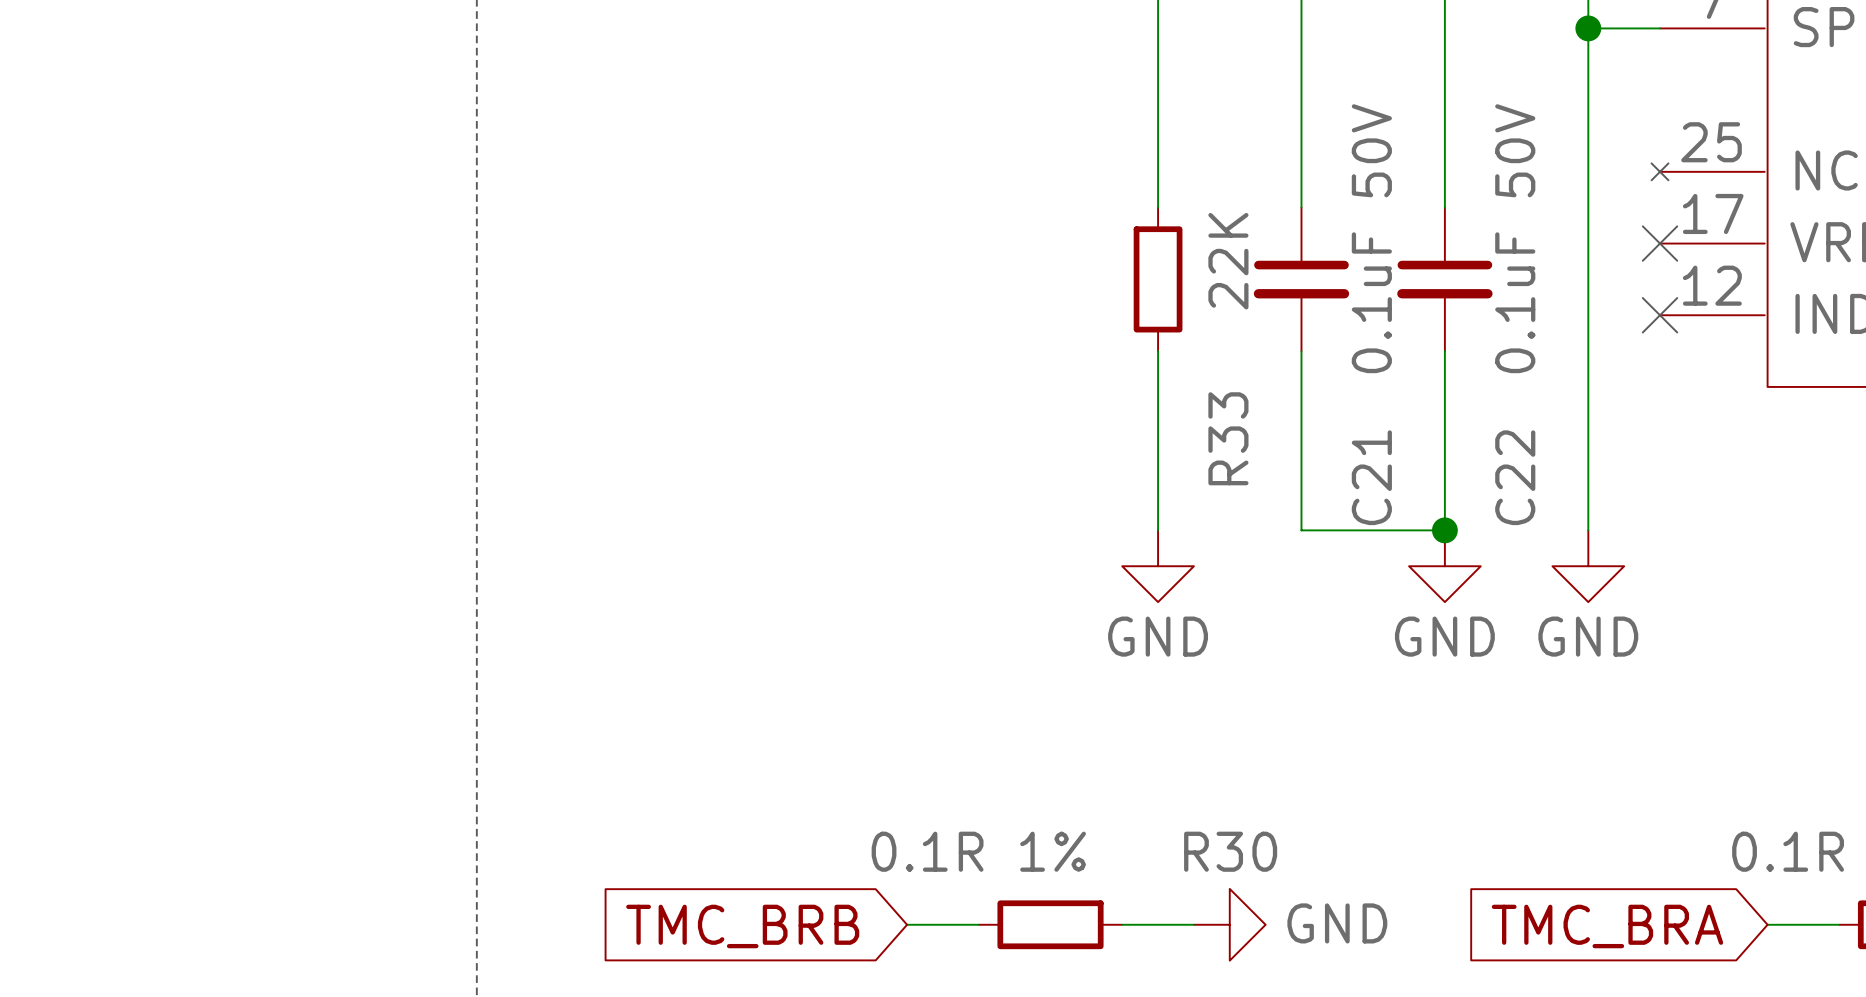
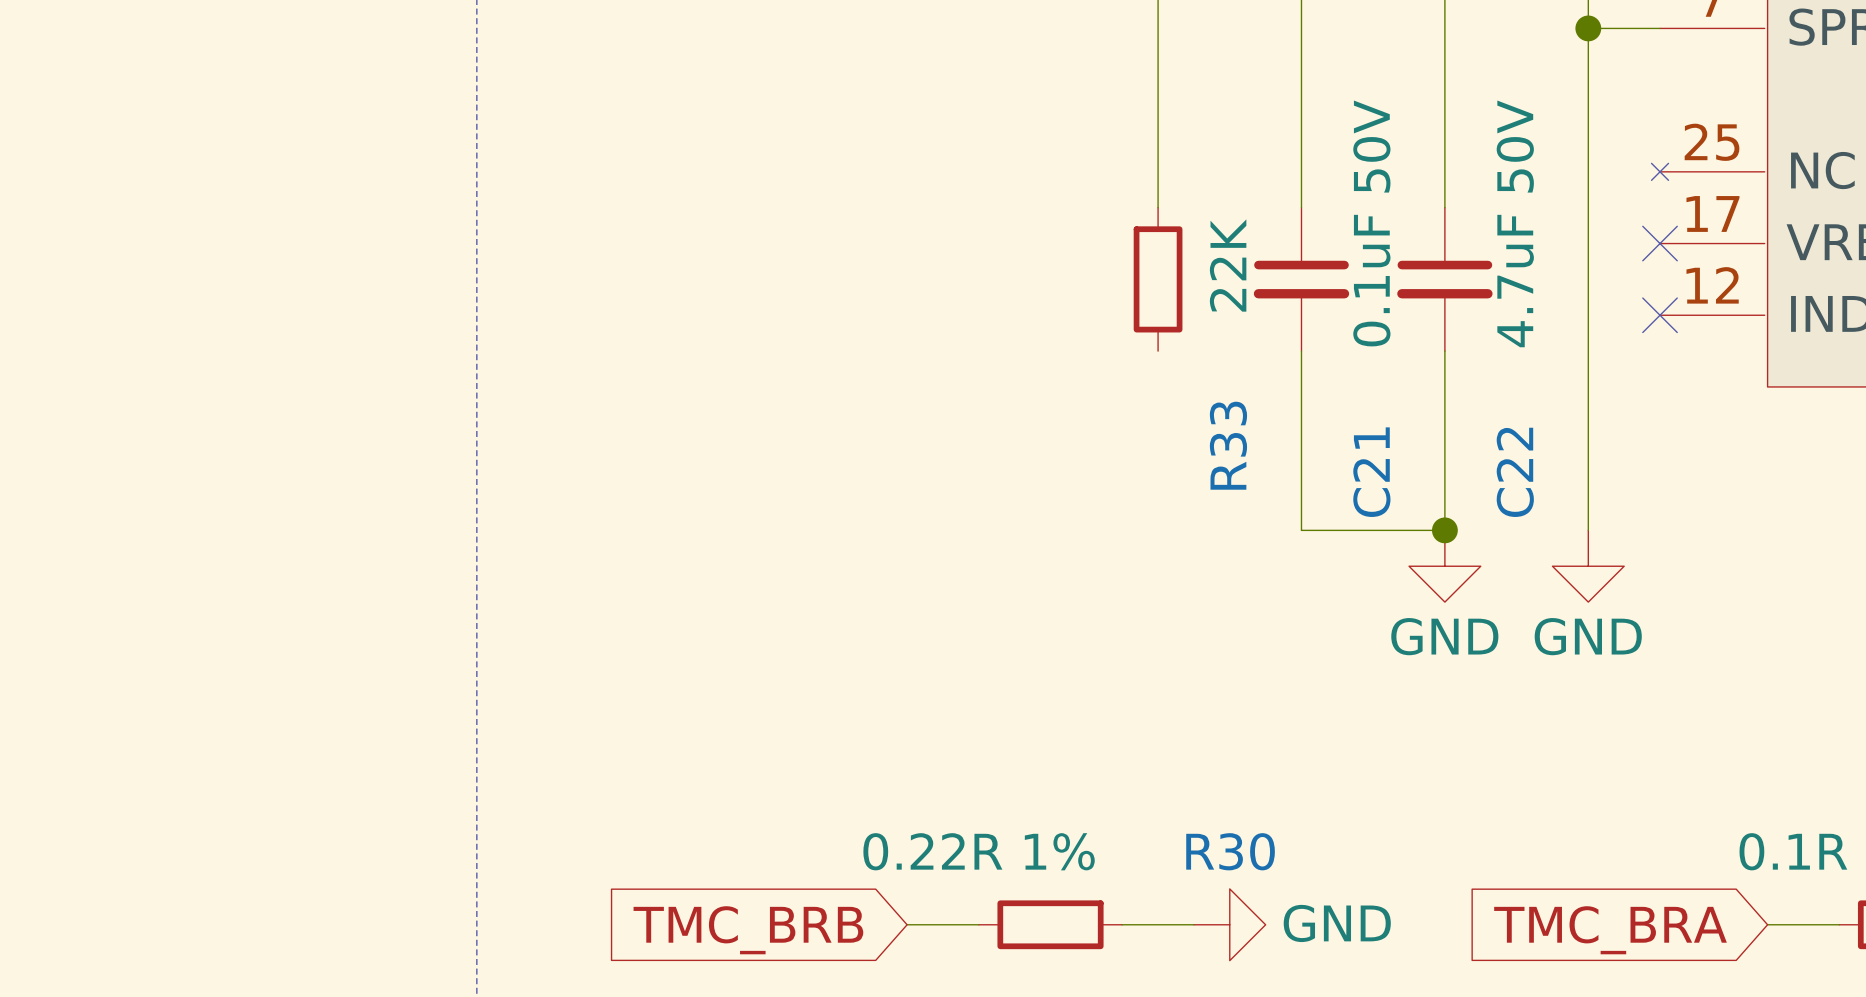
C22 value: 0.1uF 50V (1515, 238) -> 4.7uF 50V (1515, 223)
wire: (1158, 351) (1158, 530) -> none
power symbol: GND (1158, 566) -> none
R30 value: 0.1R 1% (978, 851) -> 0.22R 1% (979, 851)

